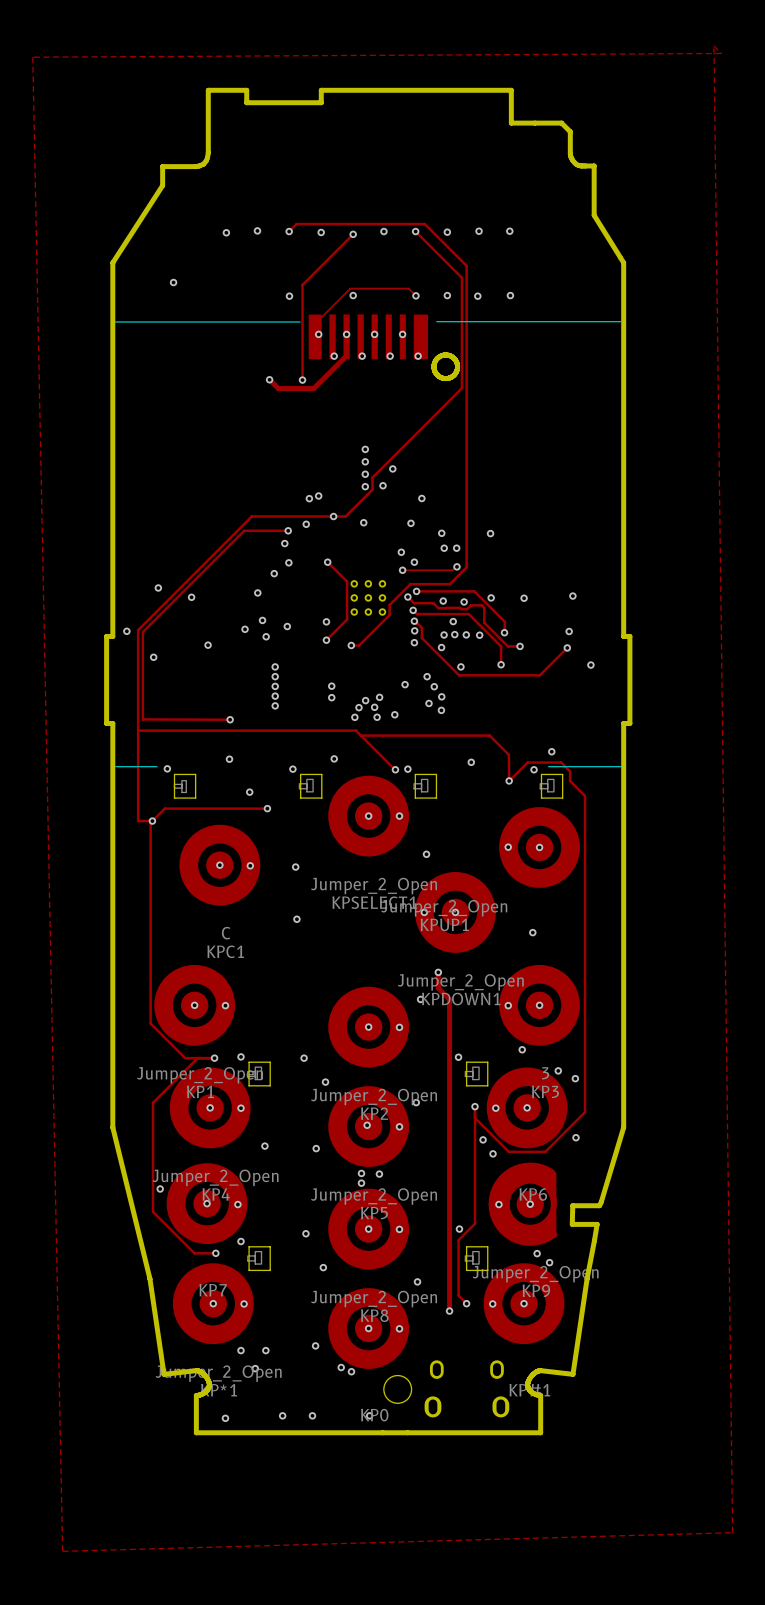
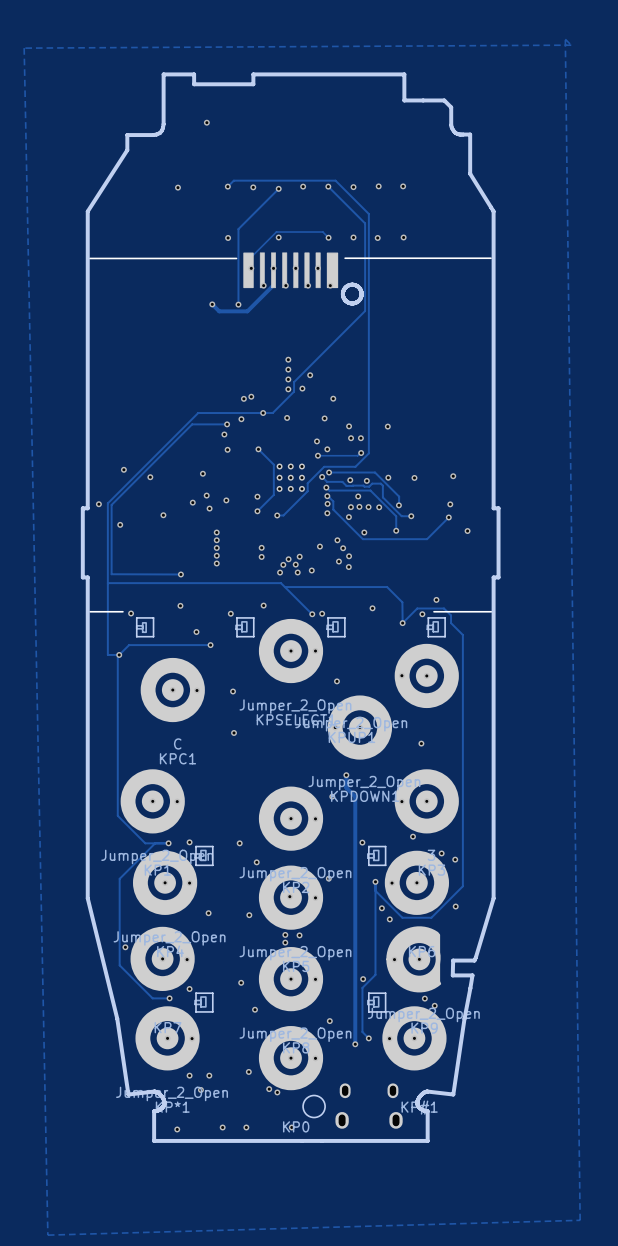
via: none -> (206, 122)
via: (257, 230) -> none
via: (173, 282) -> none
via: (274, 573) -> none

